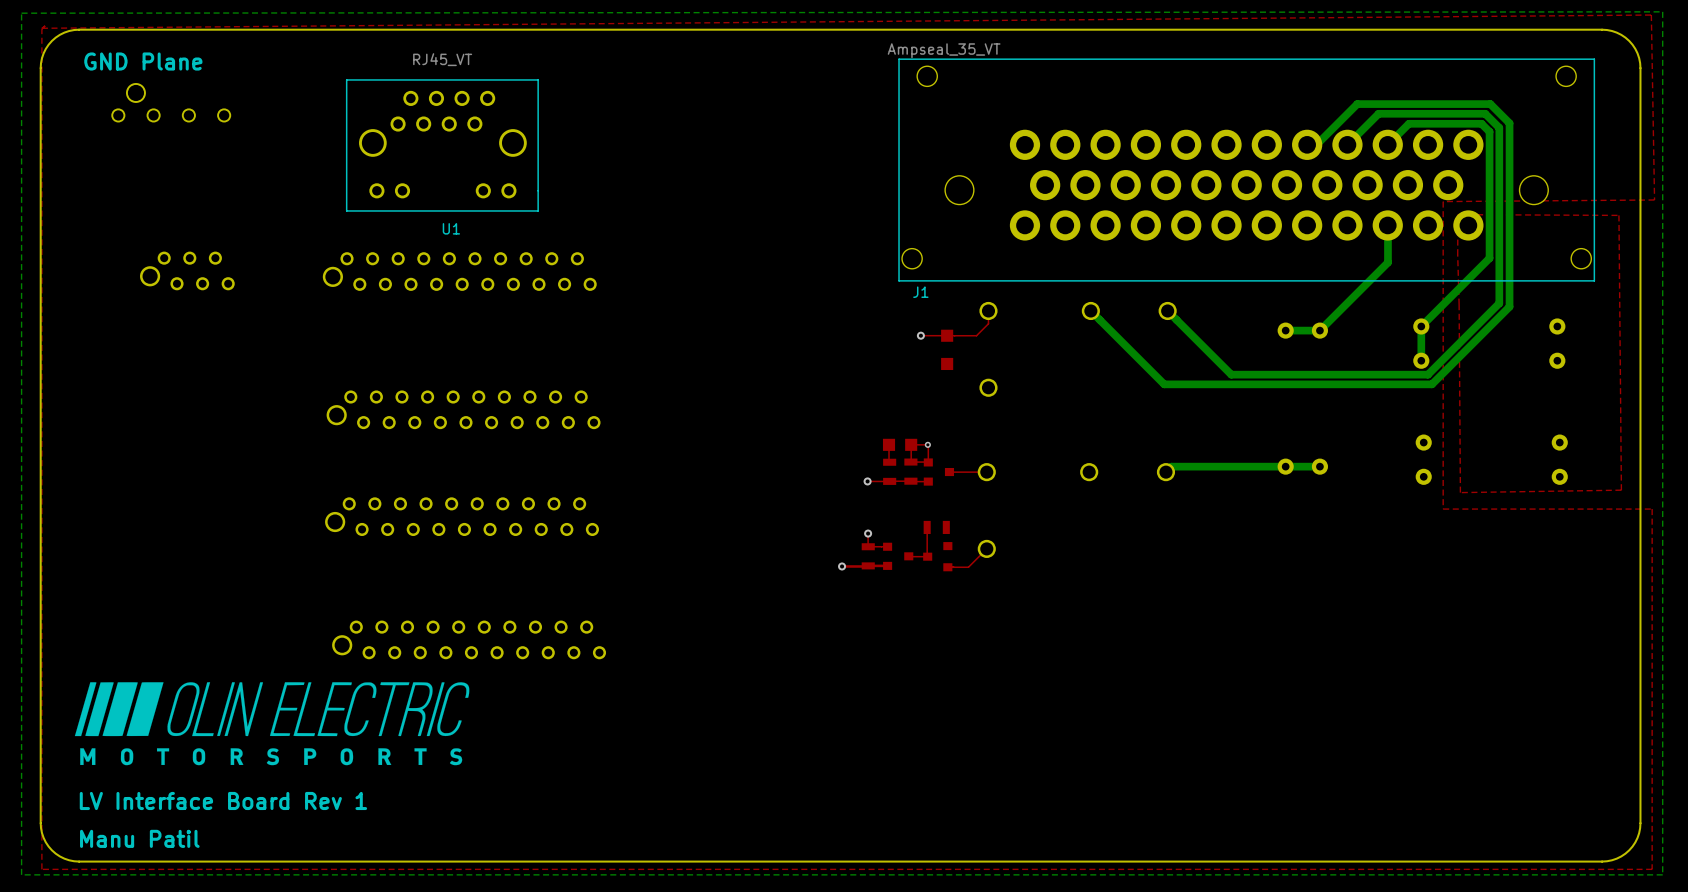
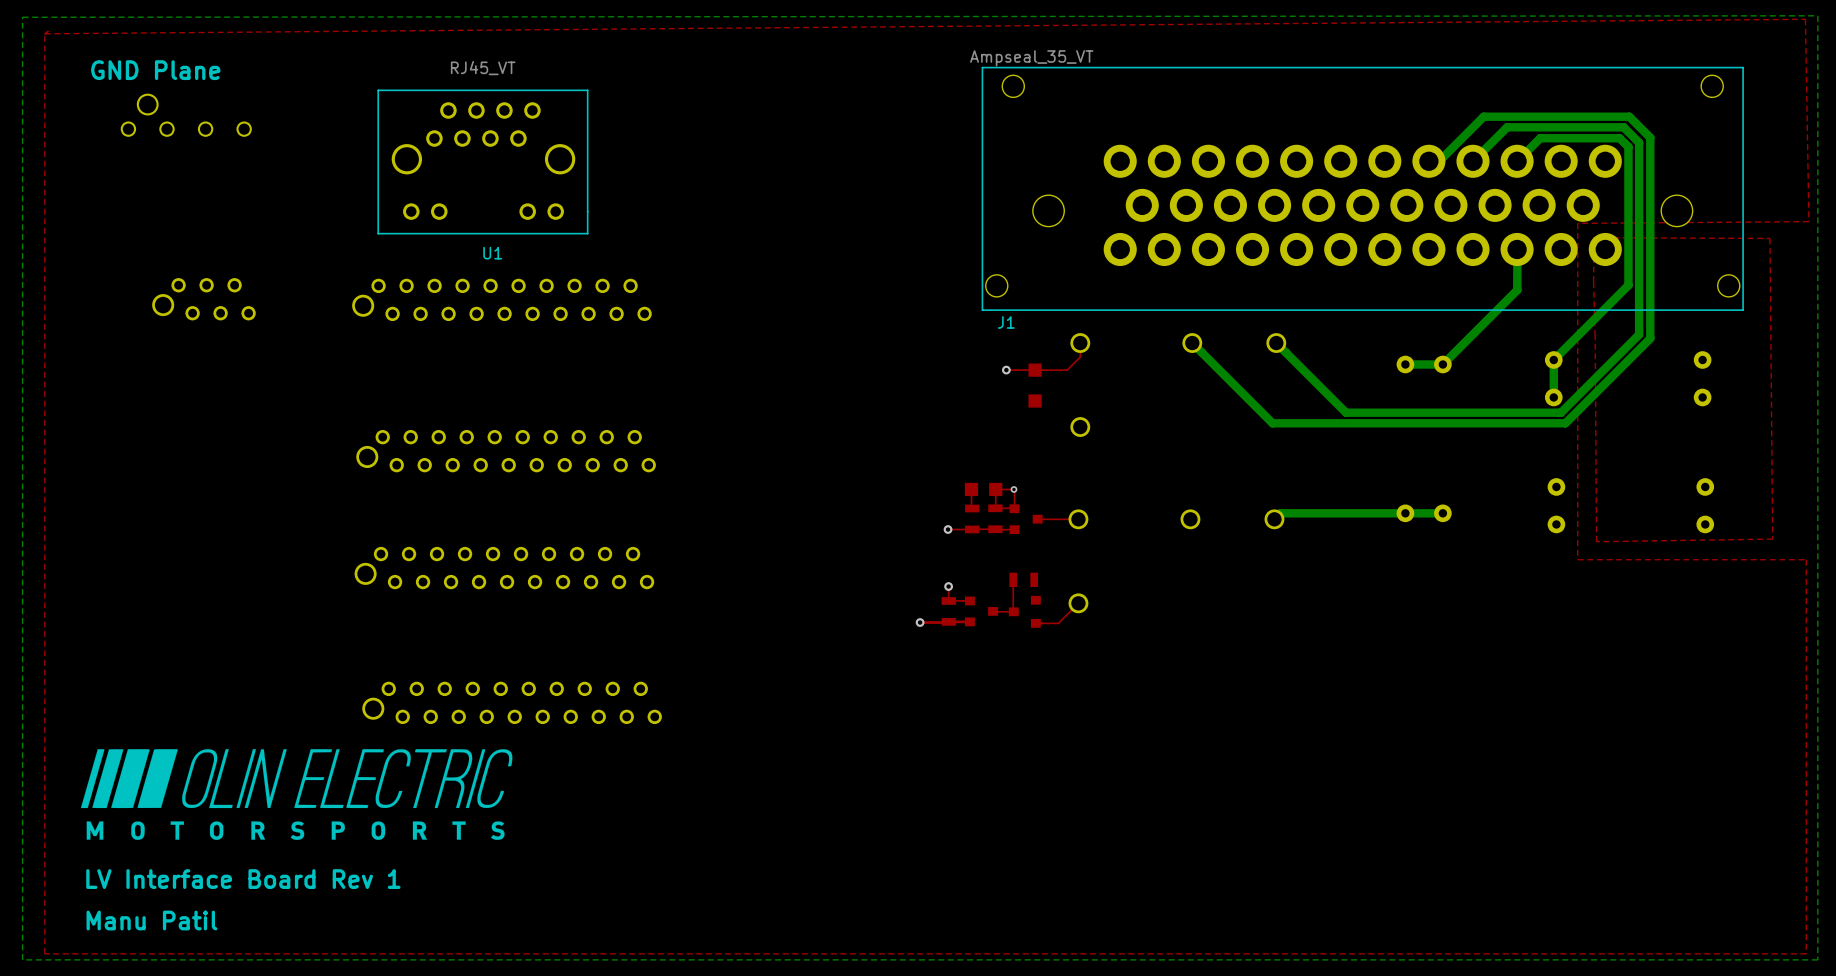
board edge: (1602, 29) (79, 29) (59, 34) (45, 48) (40, 68) (40, 823) (45, 842) (59, 856) (79, 861) (1602, 861) (1621, 856) (1635, 842) (1640, 823) (1640, 68) (1637, 53) (1629, 40) (1616, 32) (1602, 29) -> none

